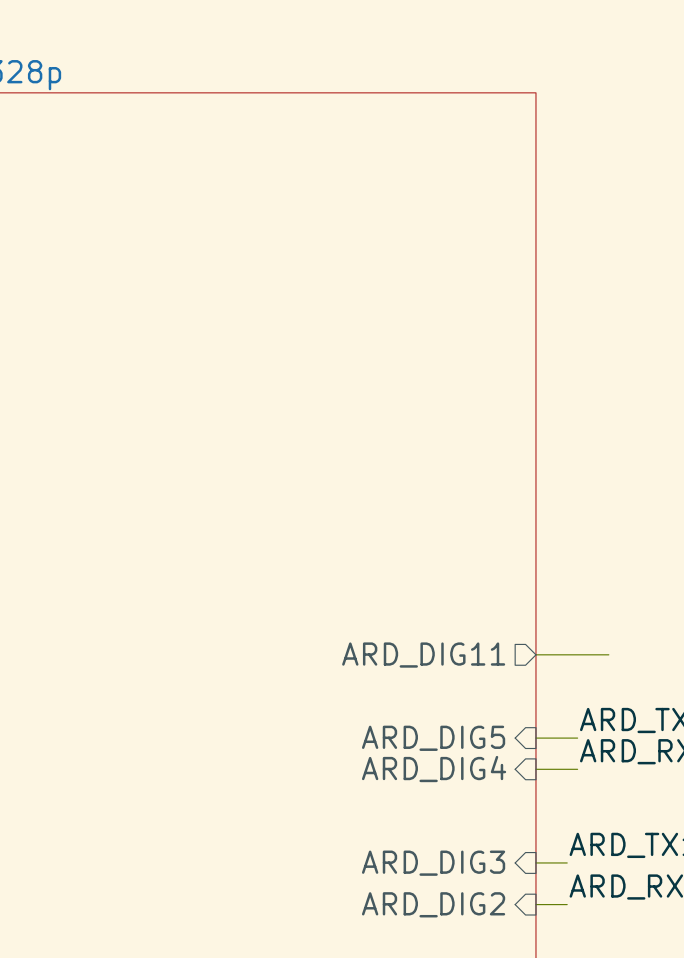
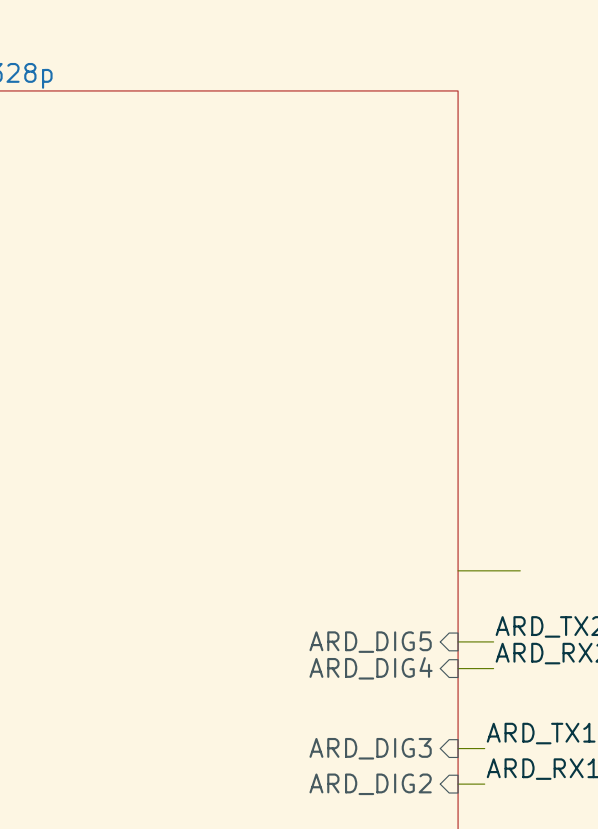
sheet pin: ARD_DIG11 (423, 655) -> none

